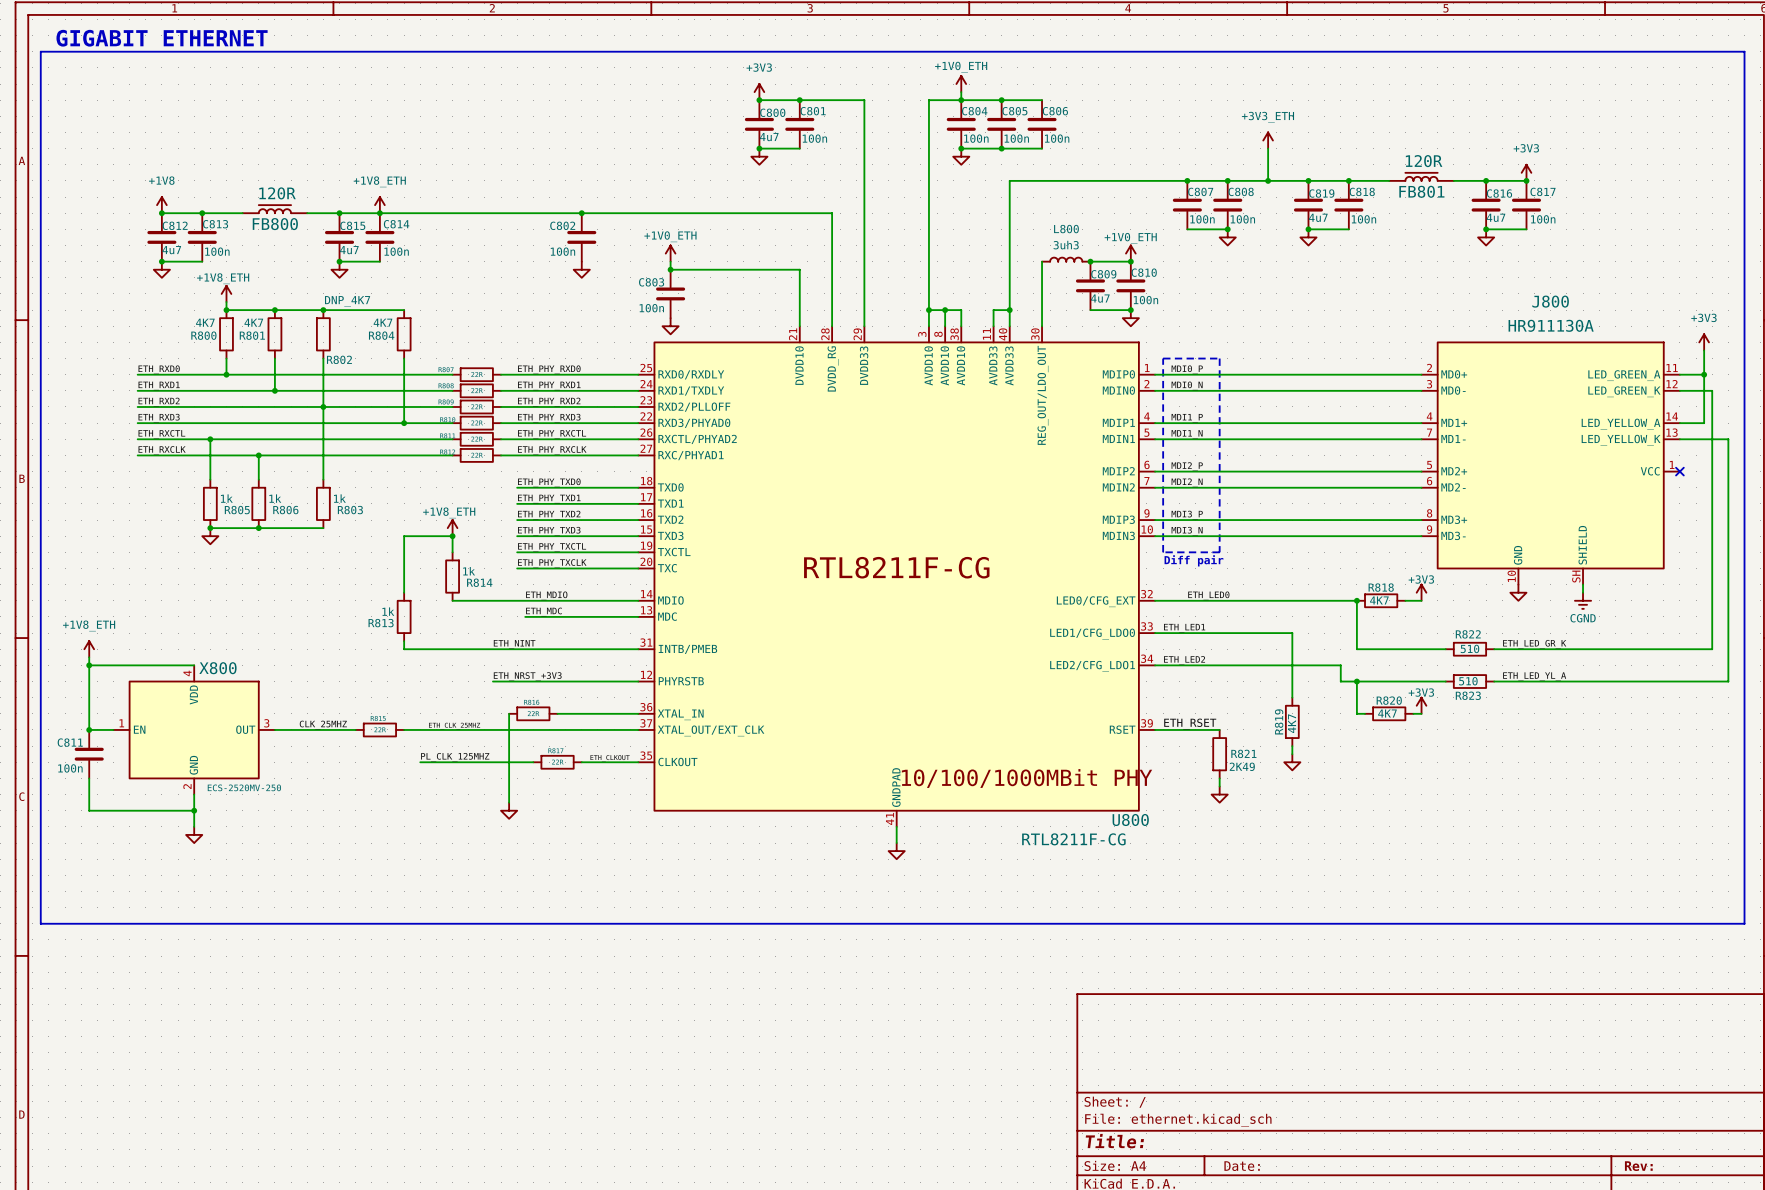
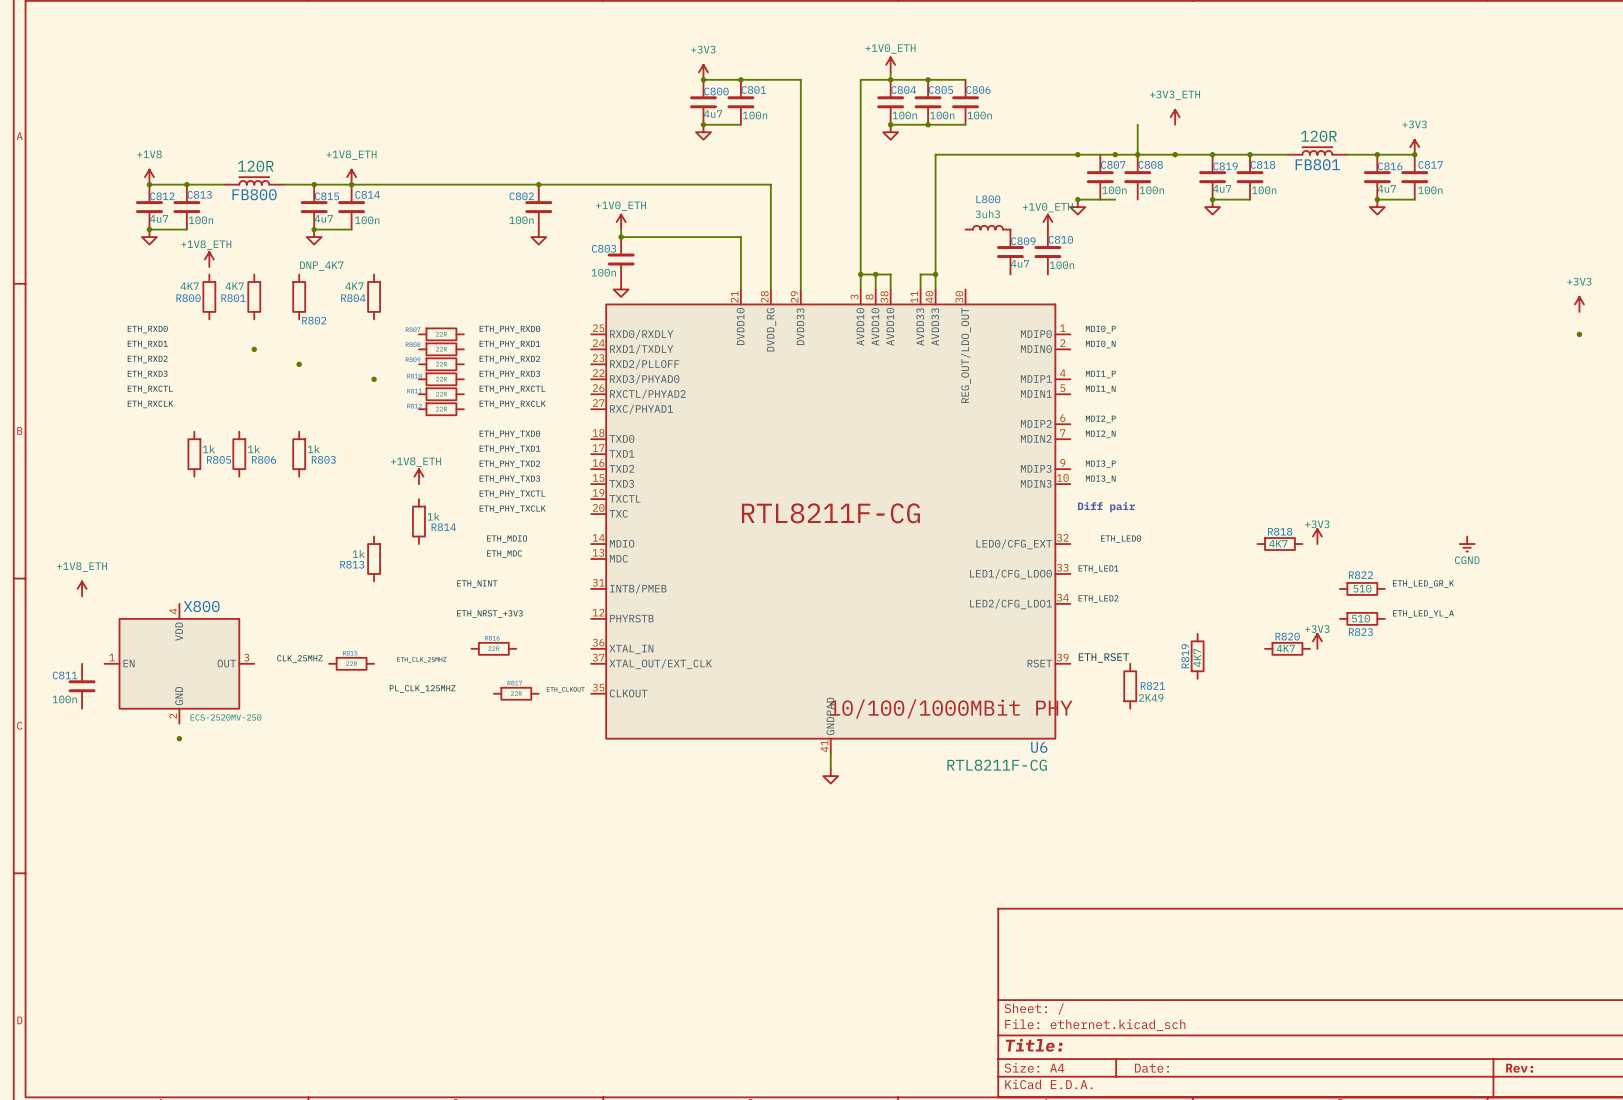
text: GIGABIT ETHERNET (162, 38) -> none
line: (40, 51) (1744, 51) (1744, 923) (40, 923) (40, 51) -> none
wire: (1268, 148) (1268, 180) -> (1137, 124) (1137, 154)
junction: none -> (1077, 154)
junction: (1187, 180) -> none
junction: none -> (1115, 154)
junction: none -> (1077, 199)
wire: (1203, 229) (1227, 229) -> (1077, 199) (1100, 199)
junction: (1227, 229) -> none
power symbol: none -> (1077, 207)
power symbol: (1227, 237) -> none
wire: (1042, 261) (1042, 326) -> none
wire: (1090, 261) (1130, 261) -> none
junction: (1090, 261) -> none
junction: (1130, 261) -> none
wire: (226, 302) (226, 310) (404, 310) -> none
junction: (226, 310) -> none
junction: (274, 310) -> none
junction: (323, 310) -> none
wire: (1090, 310) (1130, 310) -> none
junction: (1130, 310) -> none
power symbol: (1130, 318) -> none
wire: (1704, 350) (1704, 423) (1679, 423) -> none
wire: (226, 358) (226, 374) -> none
wire: (274, 358) (274, 390) -> none
wire: (323, 358) (323, 479) -> none
wire: (404, 358) (404, 423) -> none
line: (1163, 358) (1219, 358) (1219, 552) (1163, 552) (1163, 358) -> none
wire: (137, 374) (452, 374) -> none
junction: (226, 374) -> none
wire: (501, 374) (638, 374) -> none
wire: (1155, 374) (1421, 374) -> none
wire: (1679, 374) (1704, 374) -> none
wire: (137, 390) (452, 390) -> none
wire: (501, 390) (638, 390) -> none
wire: (1155, 390) (1421, 390) -> none
wire: (1679, 390) (1712, 390) (1712, 649) (1494, 649) -> none
wire: (137, 406) (452, 406) -> none
wire: (501, 406) (638, 406) -> none
wire: (137, 423) (452, 423) -> none
wire: (501, 423) (638, 423) -> none
wire: (1155, 423) (1421, 423) -> none
wire: (137, 439) (452, 439) -> none
wire: (210, 439) (210, 479) -> none
junction: (210, 439) -> none
wire: (501, 439) (638, 439) -> none
wire: (1155, 439) (1421, 439) -> none
wire: (1679, 439) (1728, 439) (1728, 681) (1494, 681) -> none
wire: (137, 455) (452, 455) -> none
wire: (258, 455) (258, 479) -> none
junction: (258, 455) -> none
wire: (501, 455) (638, 455) -> none
J800: HR911130A (1550, 463) -> none
wire: (1155, 471) (1421, 471) -> none
no-connect mark: (1679, 471) -> none
wire: (517, 487) (638, 487) -> none
wire: (1155, 487) (1421, 487) -> none
wire: (517, 503) (638, 503) -> none
wire: (517, 520) (638, 520) -> none
wire: (1155, 520) (1421, 520) -> none
wire: (210, 528) (323, 528) -> none
junction: (210, 528) -> none
junction: (258, 528) -> none
power symbol: (210, 536) -> none
junction: (452, 536) -> none
wire: (517, 536) (638, 536) -> none
wire: (1155, 536) (1421, 536) -> none
wire: (452, 552) (452, 536) (404, 536) (404, 592) -> none
wire: (517, 552) (638, 552) -> none
wire: (517, 568) (638, 568) -> none
wire: (1583, 584) (1583, 592) -> none
power symbol: (1518, 592) -> none
wire: (452, 600) (638, 600) -> none
wire: (1155, 600) (1356, 600) (1356, 649) (1445, 649) -> none
junction: (1356, 600) -> none
wire: (1405, 600) (1421, 600) -> none
wire: (525, 616) (638, 616) -> none
wire: (1155, 633) (1292, 633) (1292, 697) -> none
wire: (404, 641) (404, 649) (638, 649) -> none
wire: (89, 657) (89, 729) (113, 729) -> none
wire: (89, 665) (194, 665) -> none
junction: (89, 665) -> none
wire: (1155, 665) (1340, 665) (1340, 681) (1445, 681) -> none
wire: (492, 681) (638, 681) -> none
wire: (1356, 681) (1356, 713) (1365, 713) -> none
junction: (1356, 681) -> none
wire: (509, 713) (509, 802) -> none
wire: (557, 713) (638, 713) -> none
wire: (1413, 713) (1421, 713) -> none
junction: (89, 729) -> none
wire: (274, 729) (355, 729) -> none
wire: (404, 729) (638, 729) -> none
wire: (1155, 729) (1219, 729) -> none
wire: (1292, 746) (1292, 754) -> none
wire: (420, 762) (533, 762) -> none
wire: (581, 762) (638, 762) -> none
power symbol: (1292, 762) -> none
wire: (89, 778) (89, 810) (194, 810) -> none
wire: (1219, 778) (1219, 786) -> none
wire: (194, 794) (194, 826) -> none
power symbol: (1219, 794) -> none
power symbol: (509, 810) -> none
U800 name: U800 (1130, 819) -> U6 (1039, 747)
power symbol: (194, 834) -> none

